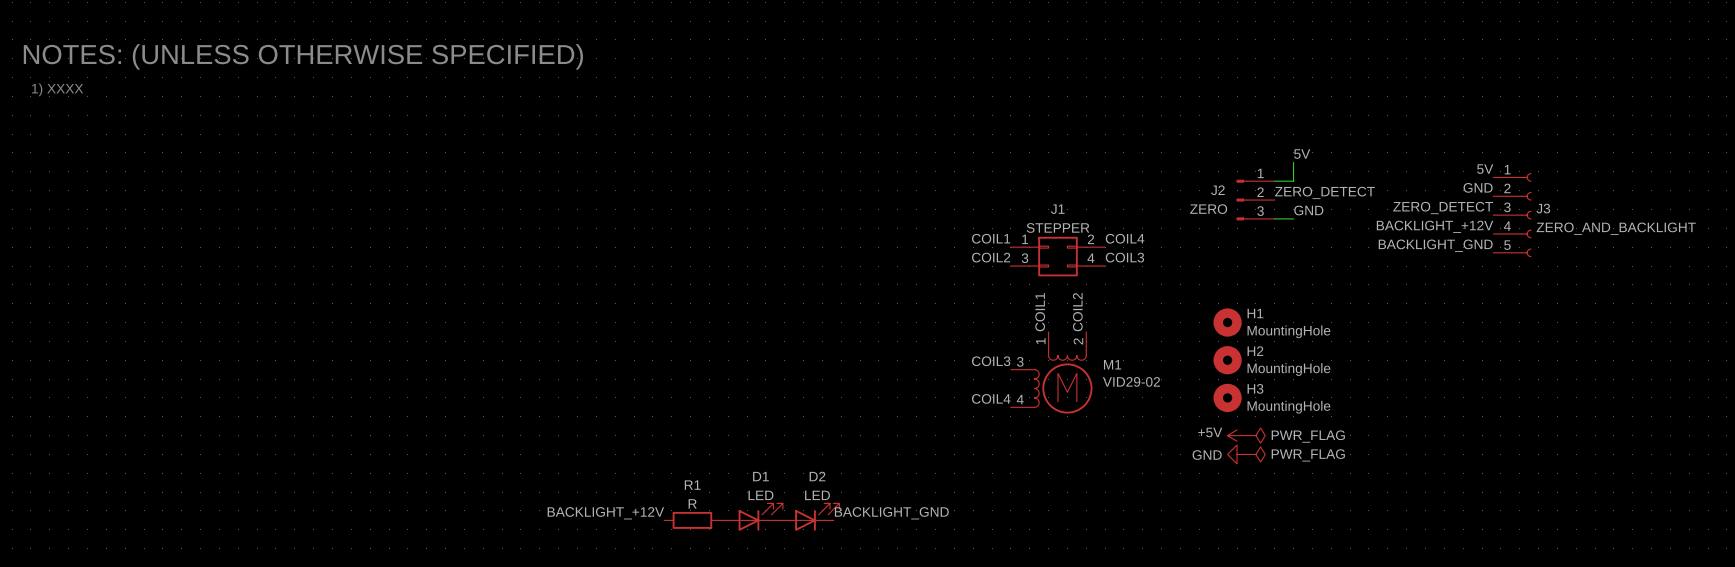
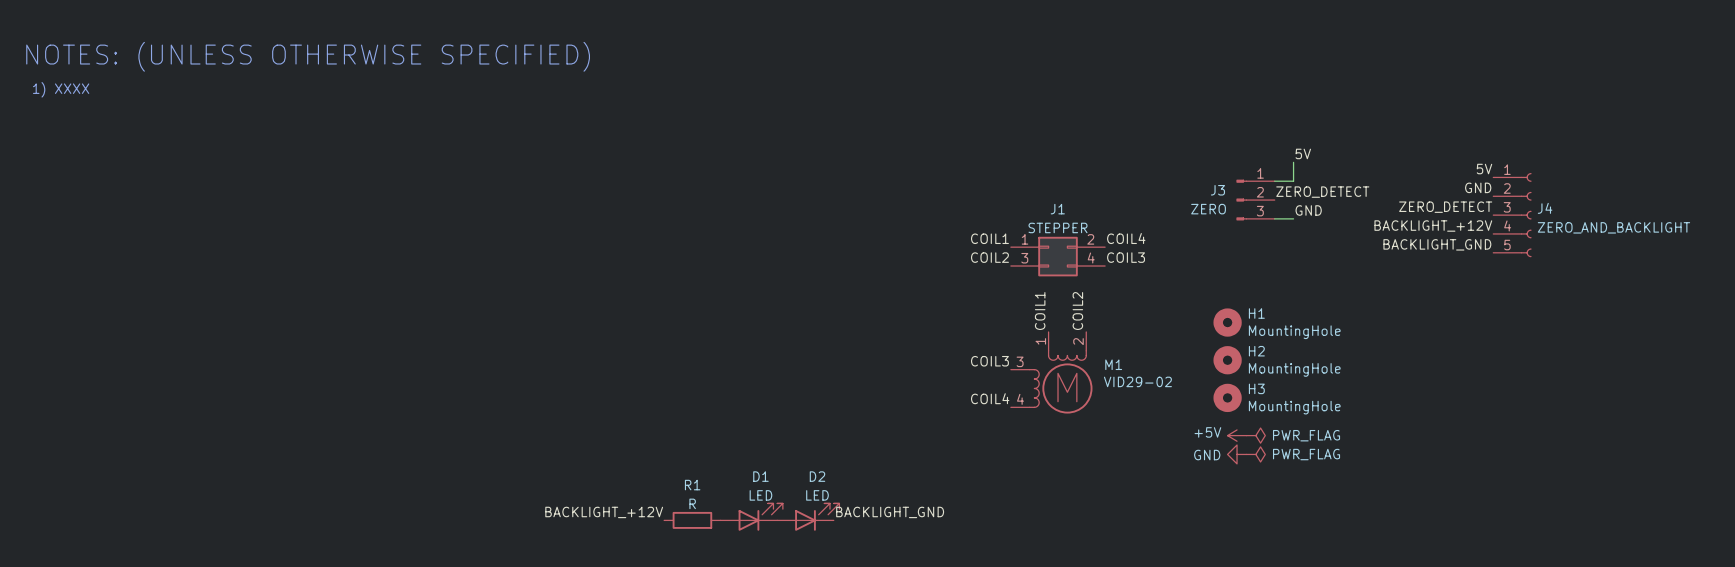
J2 name: J2 (1217, 190) -> J3 (1217, 190)
J3 name: J3 (1543, 208) -> J4 (1545, 208)

